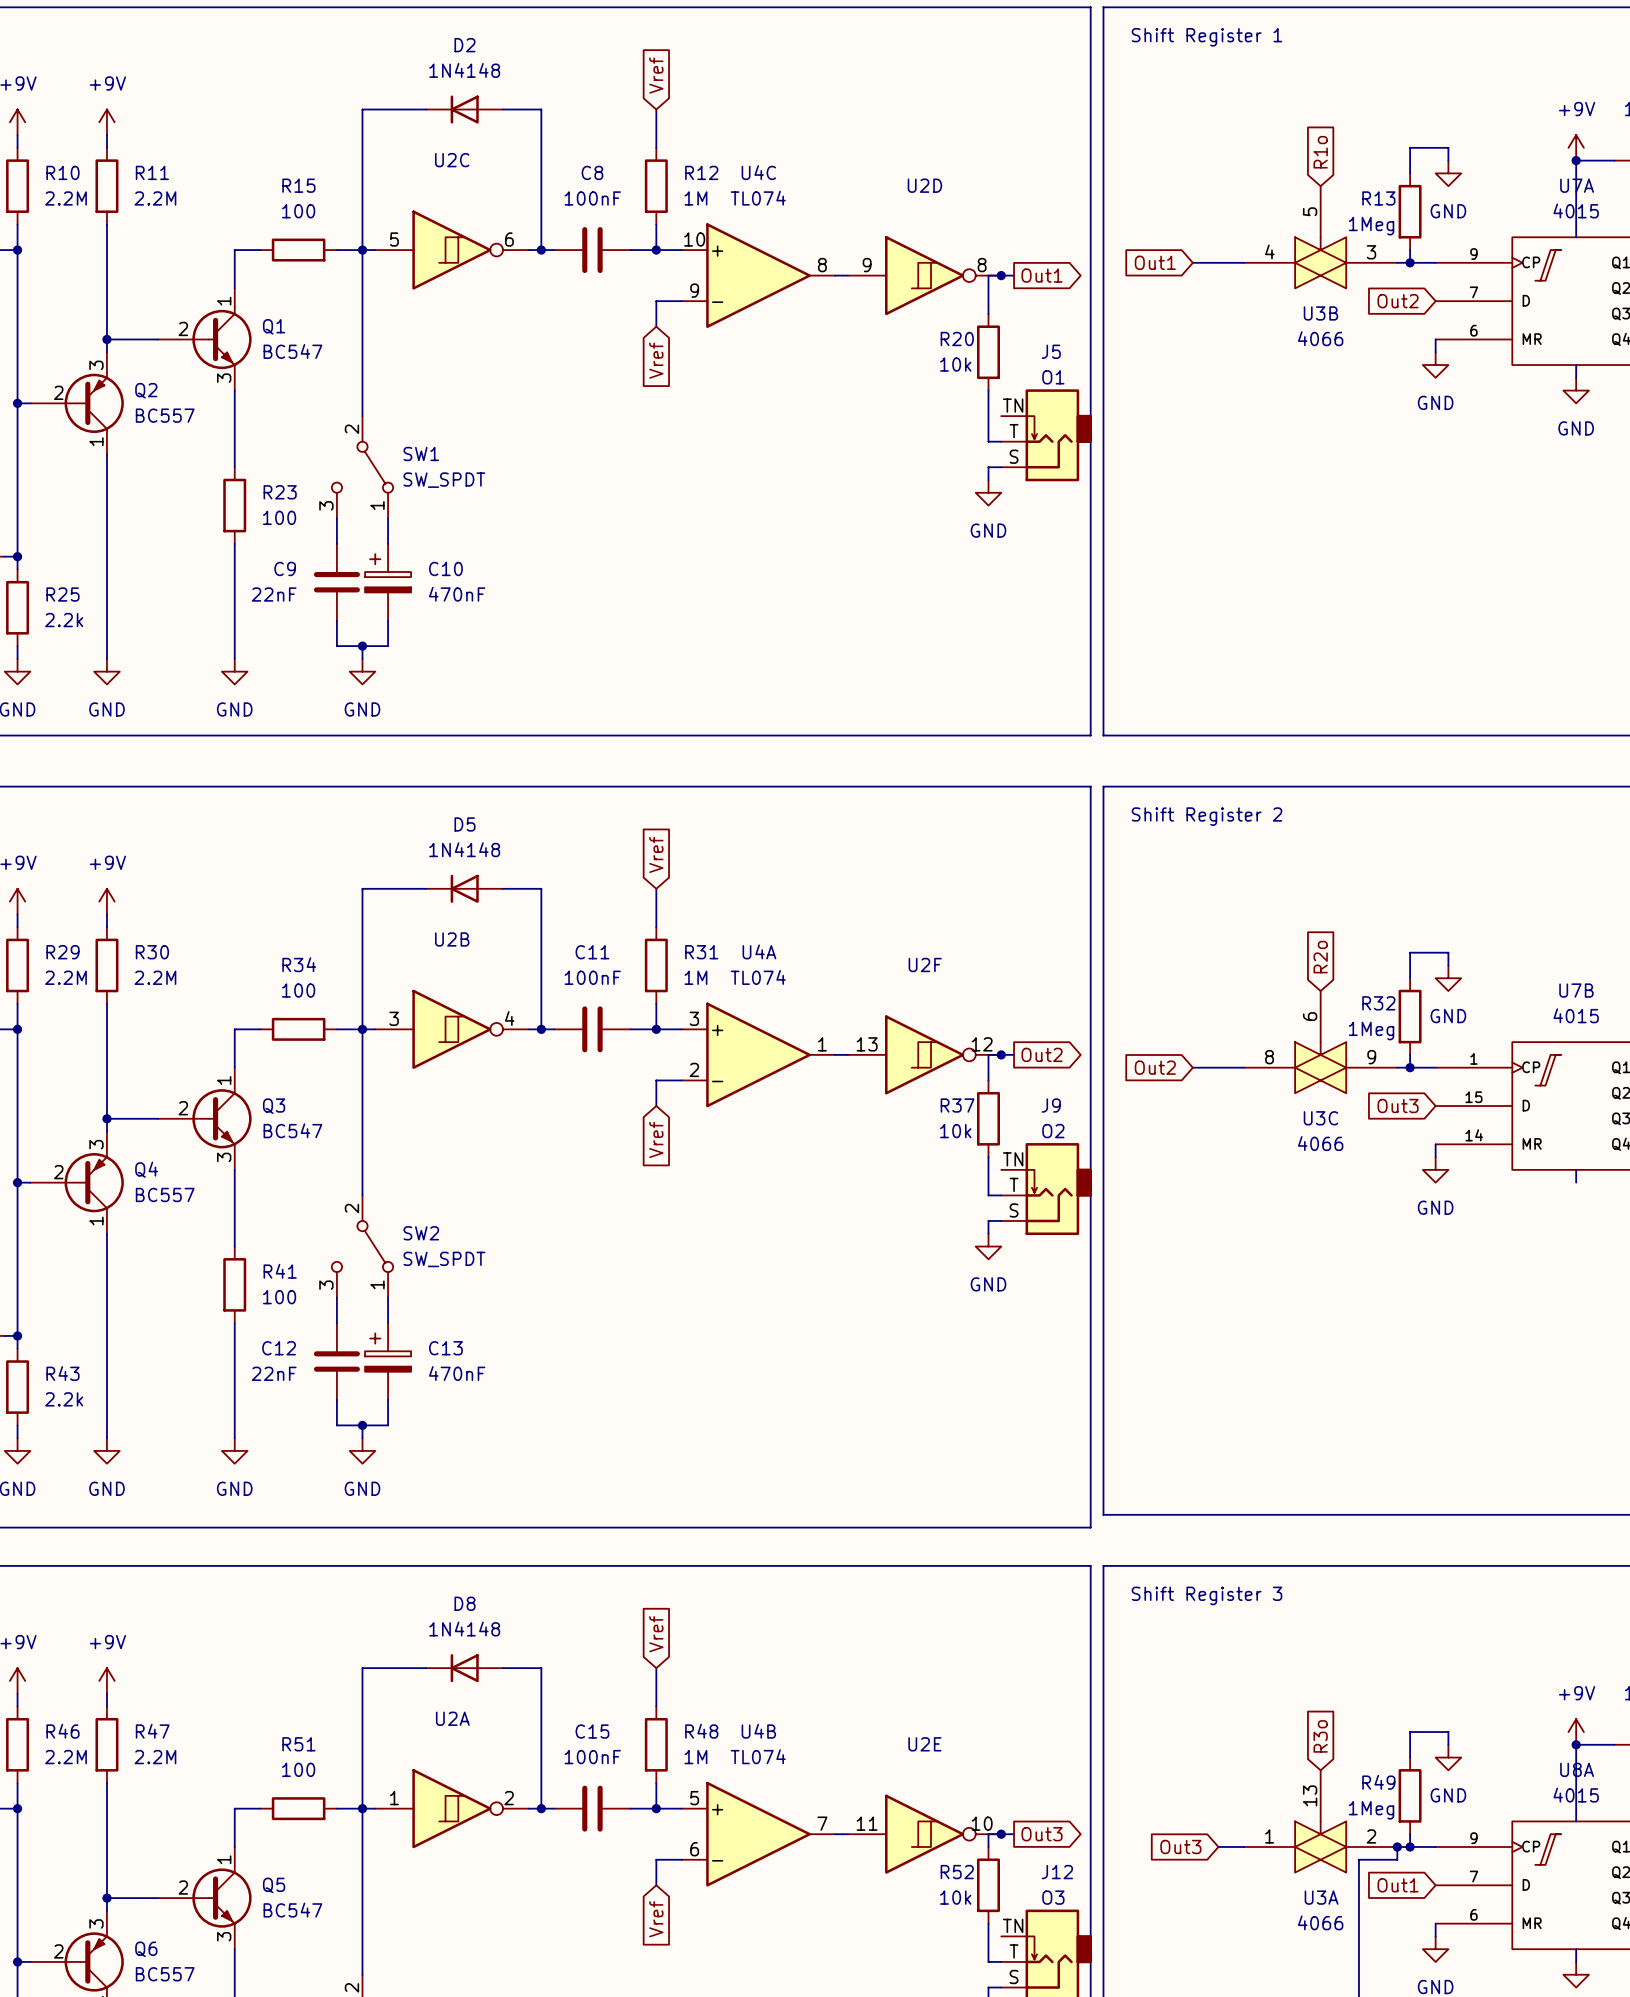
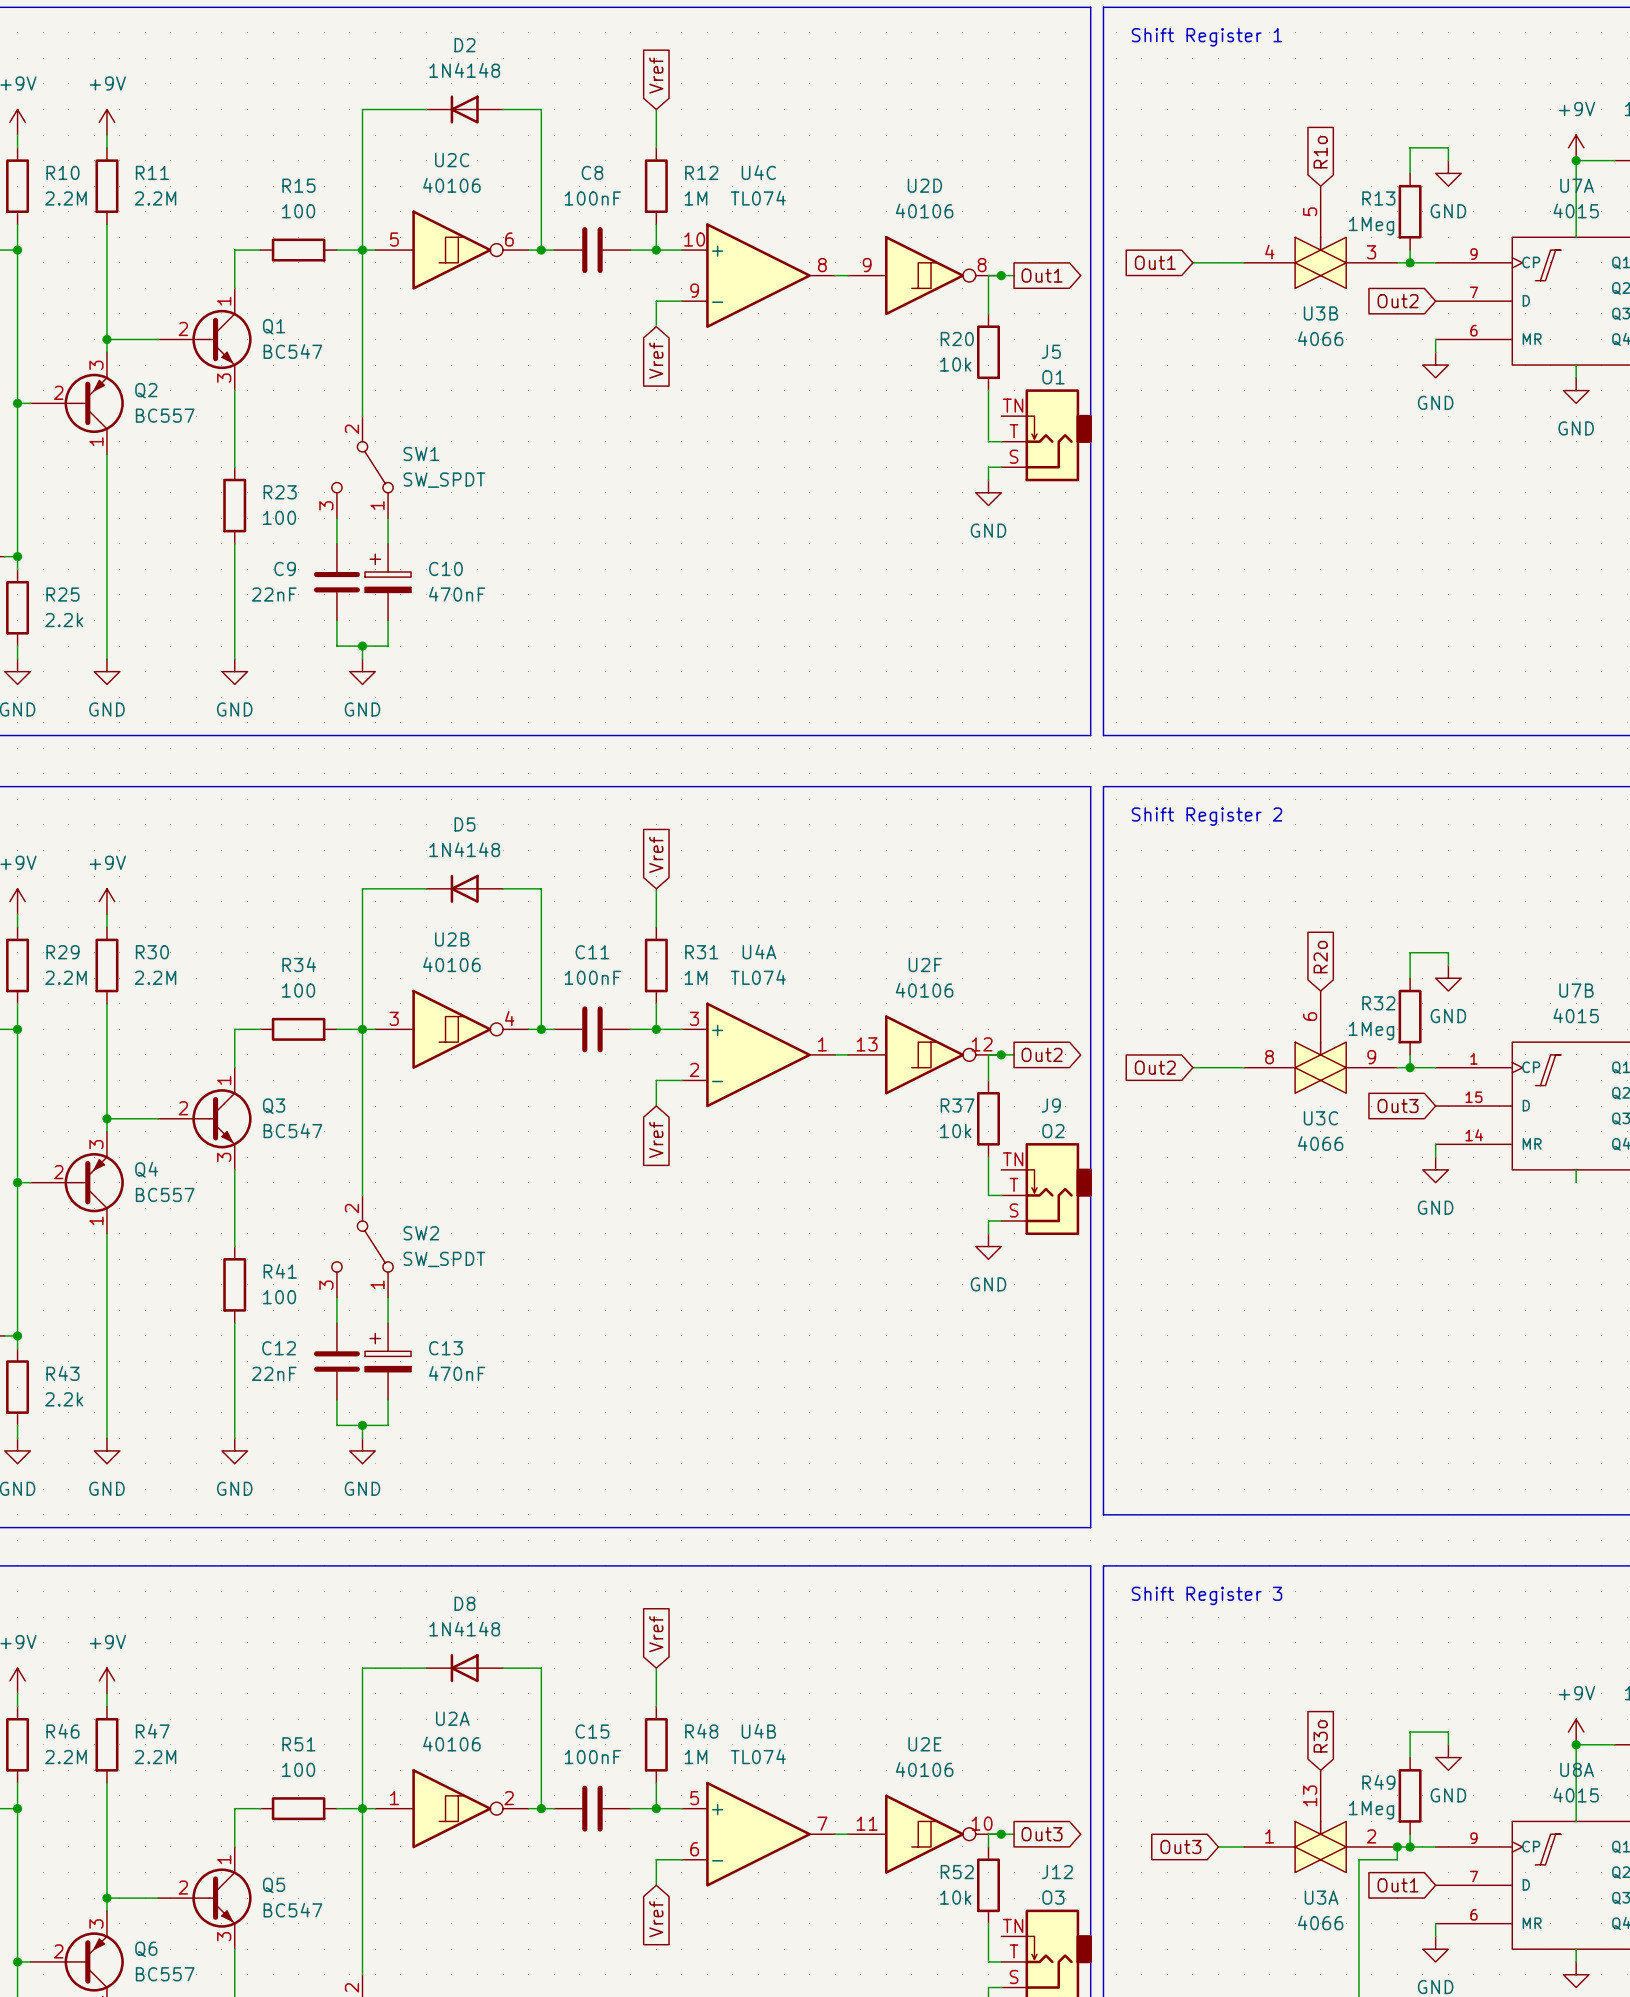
U2C value: none -> 40106 (451, 185)
U2D value: none -> 40106 (924, 210)
U2B value: none -> 40106 (451, 964)
U2F value: none -> 40106 (924, 990)
U2A value: none -> 40106 (451, 1744)
U2E value: none -> 40106 (924, 1769)

